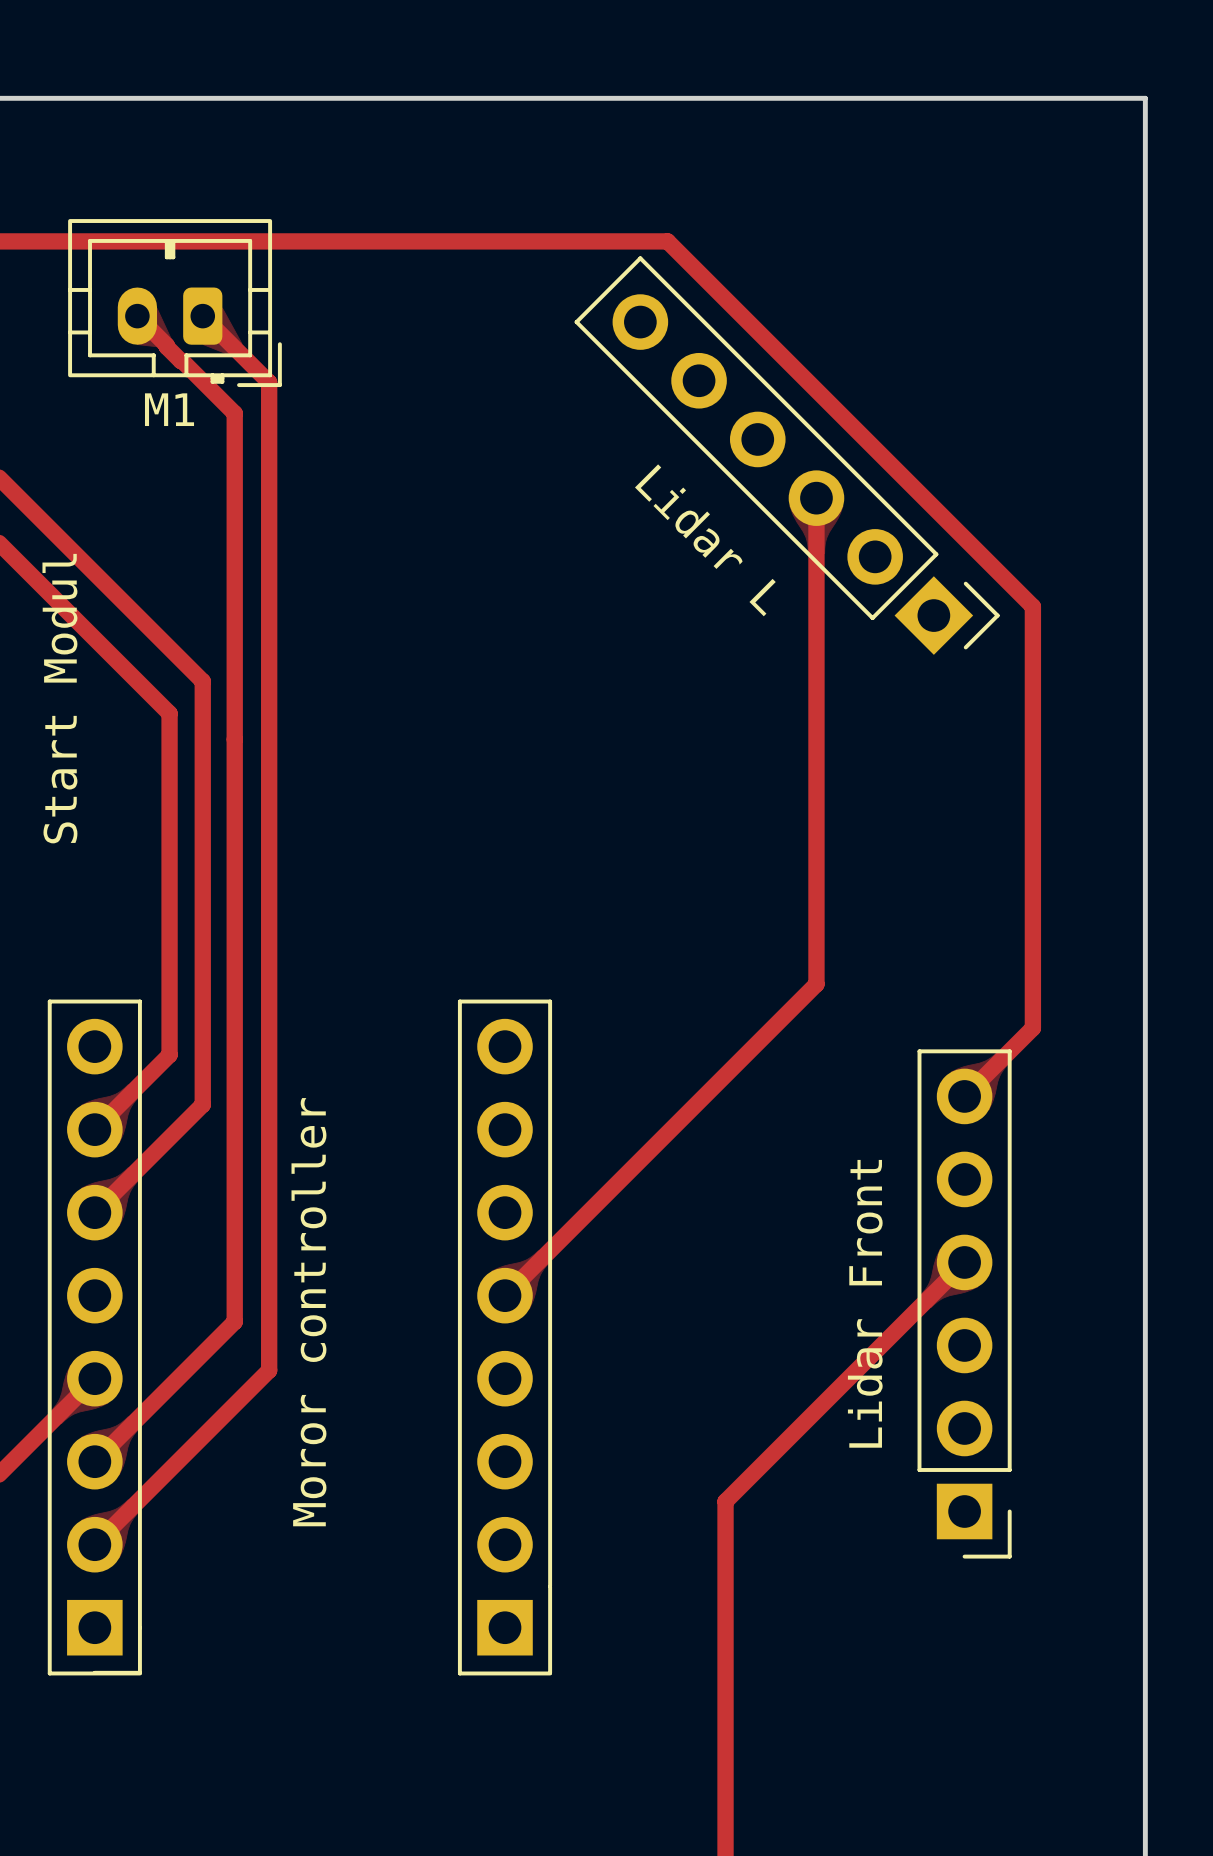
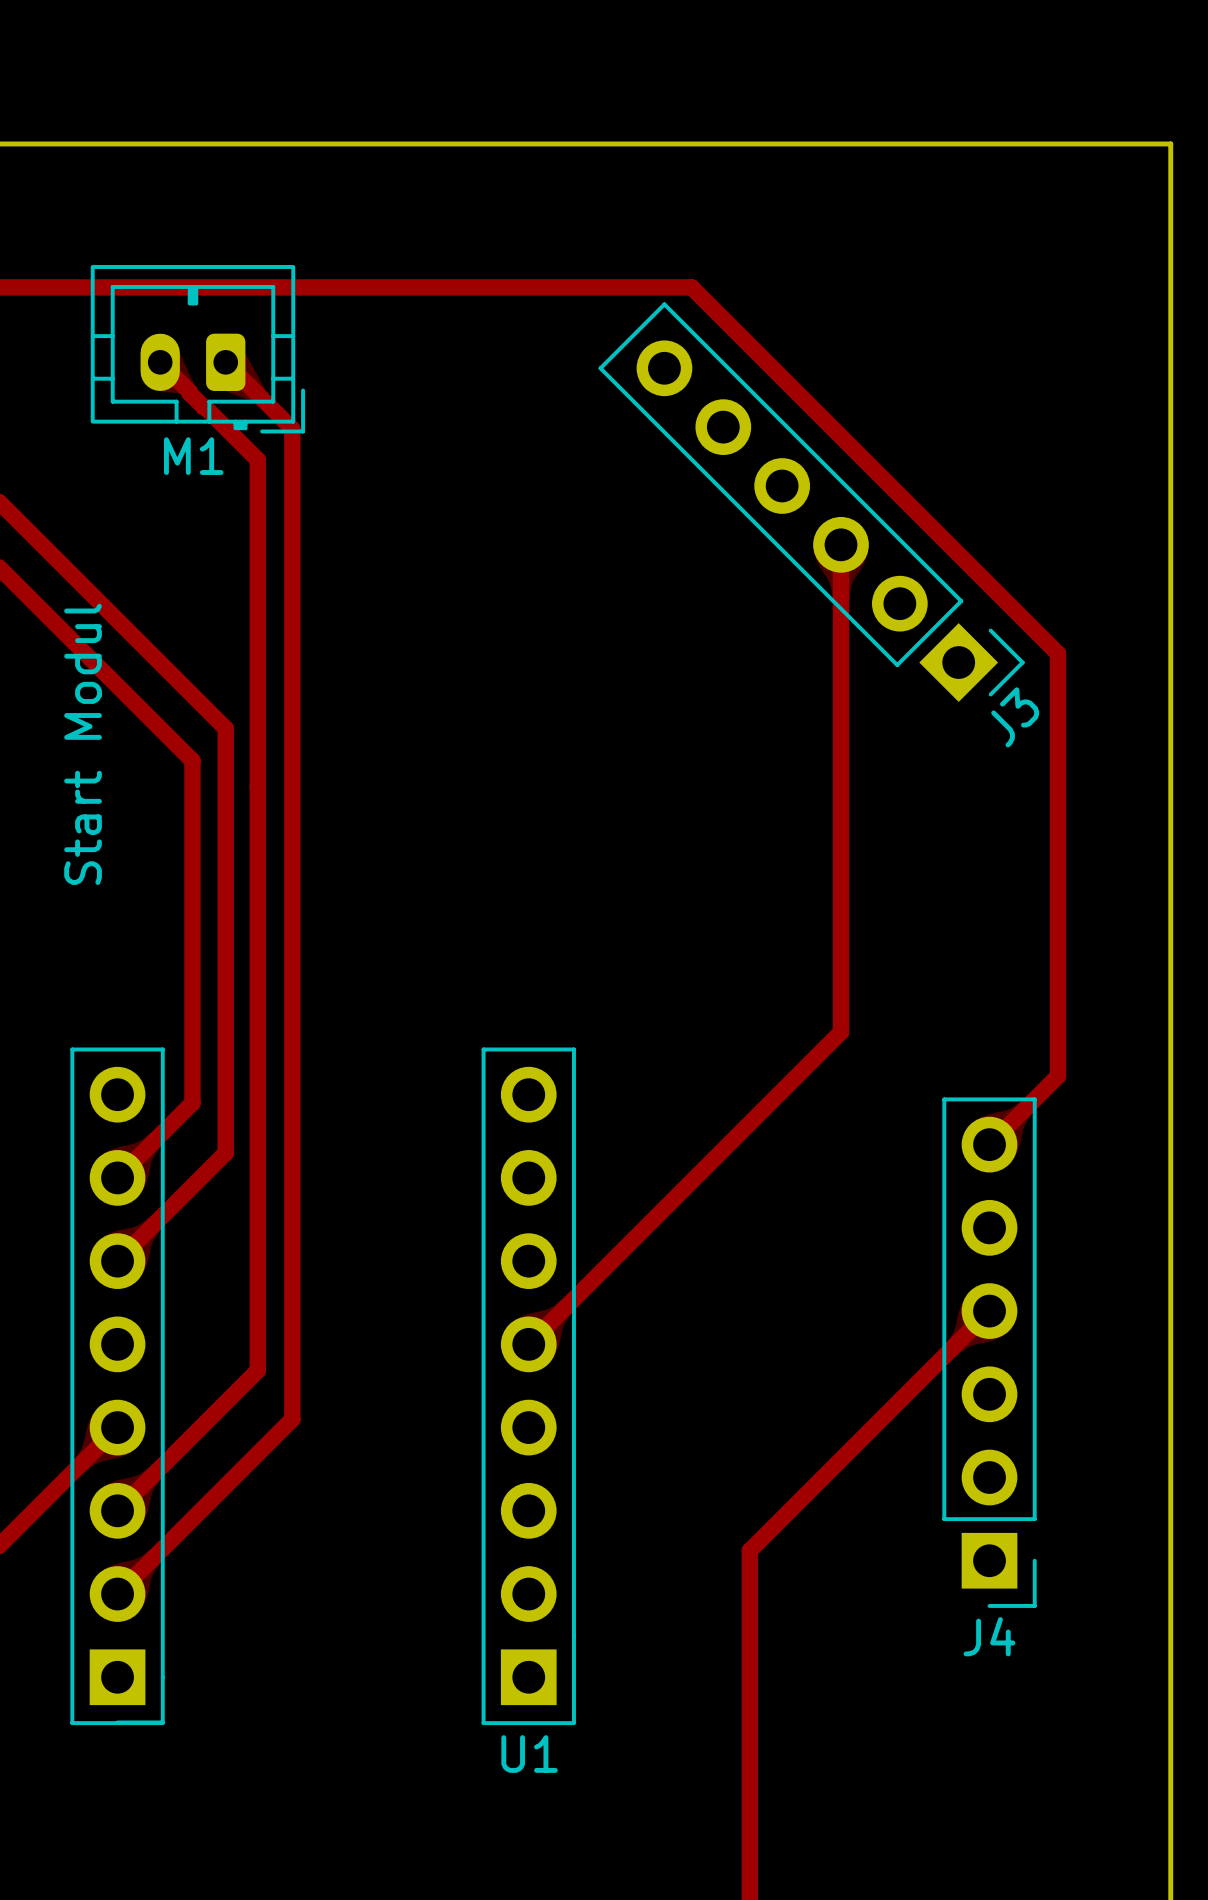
Lidar L name: Lidar L (705, 540) -> J3 (1015, 717)
Lidar Front name: Lidar Front (865, 1303) -> J4 (989, 1636)
Moror controller name: Moror controller (308, 1312) -> U1 (529, 1754)

